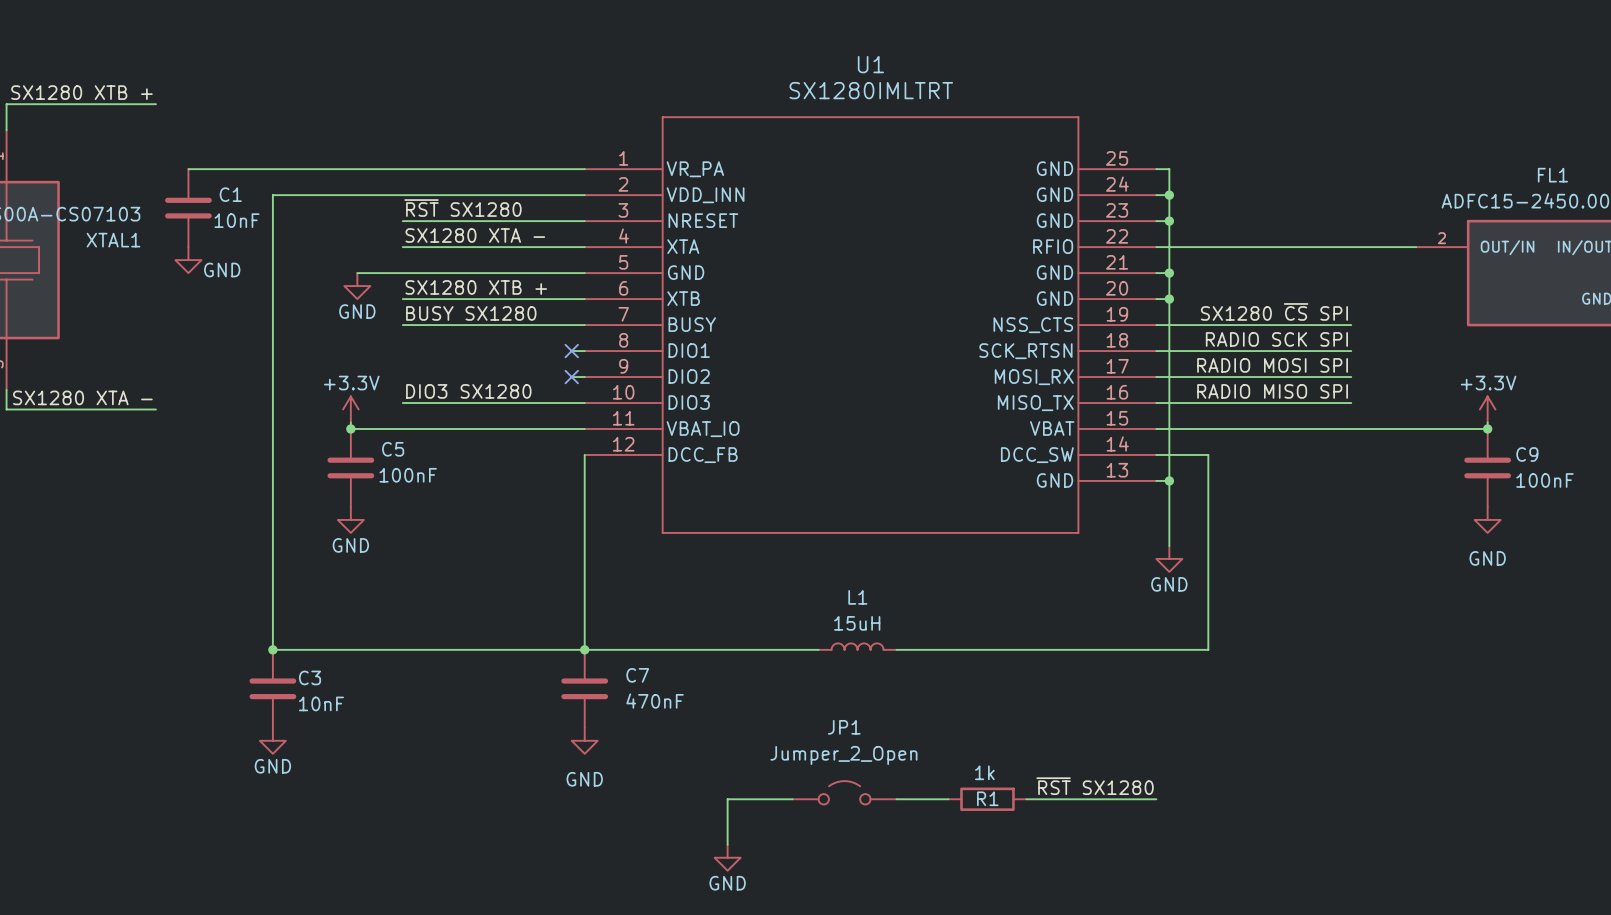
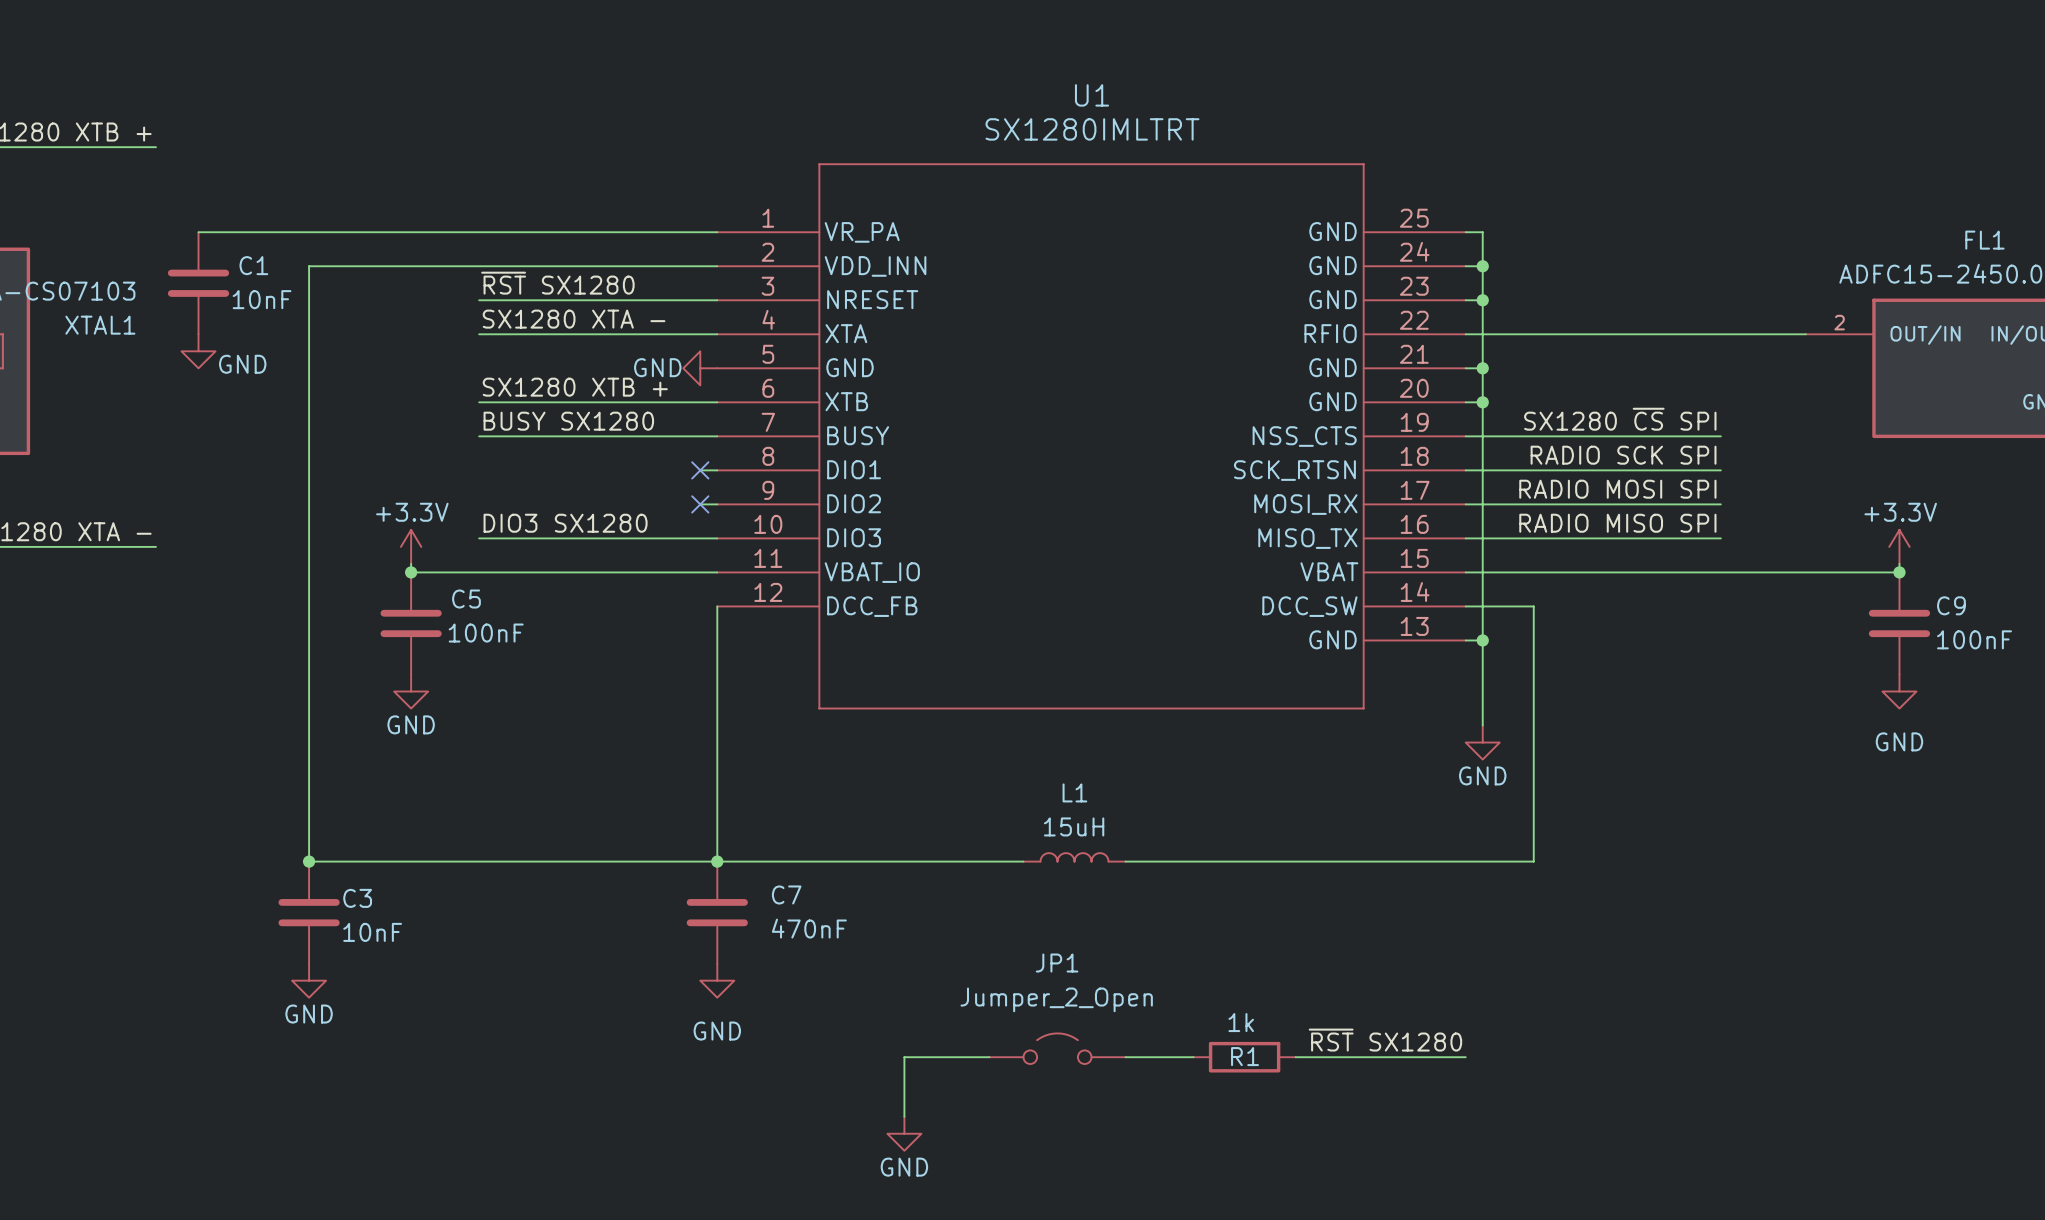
wire: (357, 273) (584, 273) -> none
power symbol rotation: 0° (357, 286) -> 90° clockwise (700, 368)
power symbol position: GND (357, 286) -> GND (700, 368)

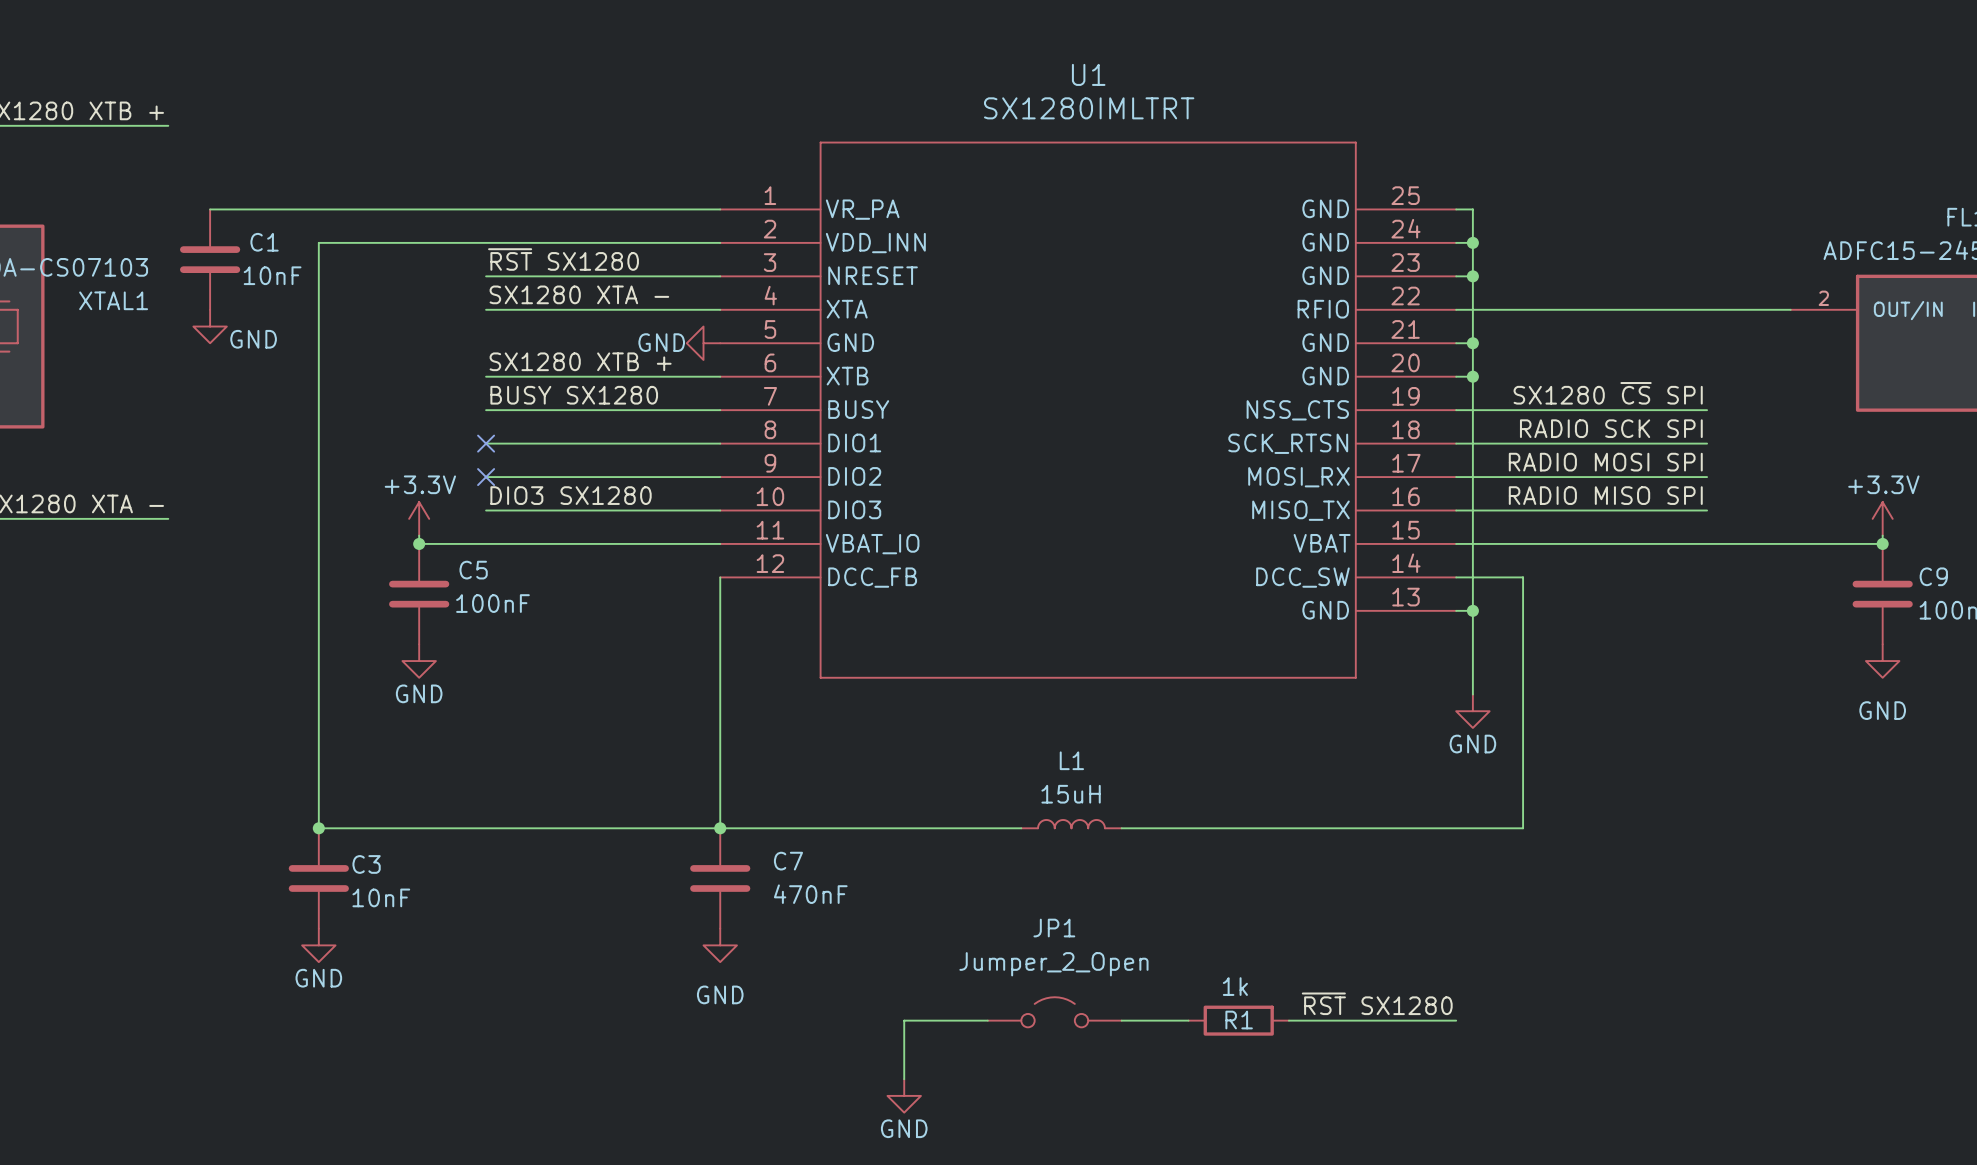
wire: none -> (486, 443) (703, 443)
no-connect mark: none -> (486, 443)
no-connect mark: (700, 470) -> none
wire: none -> (486, 477) (703, 477)
no-connect mark: none -> (486, 477)
no-connect mark: (700, 504) -> none

